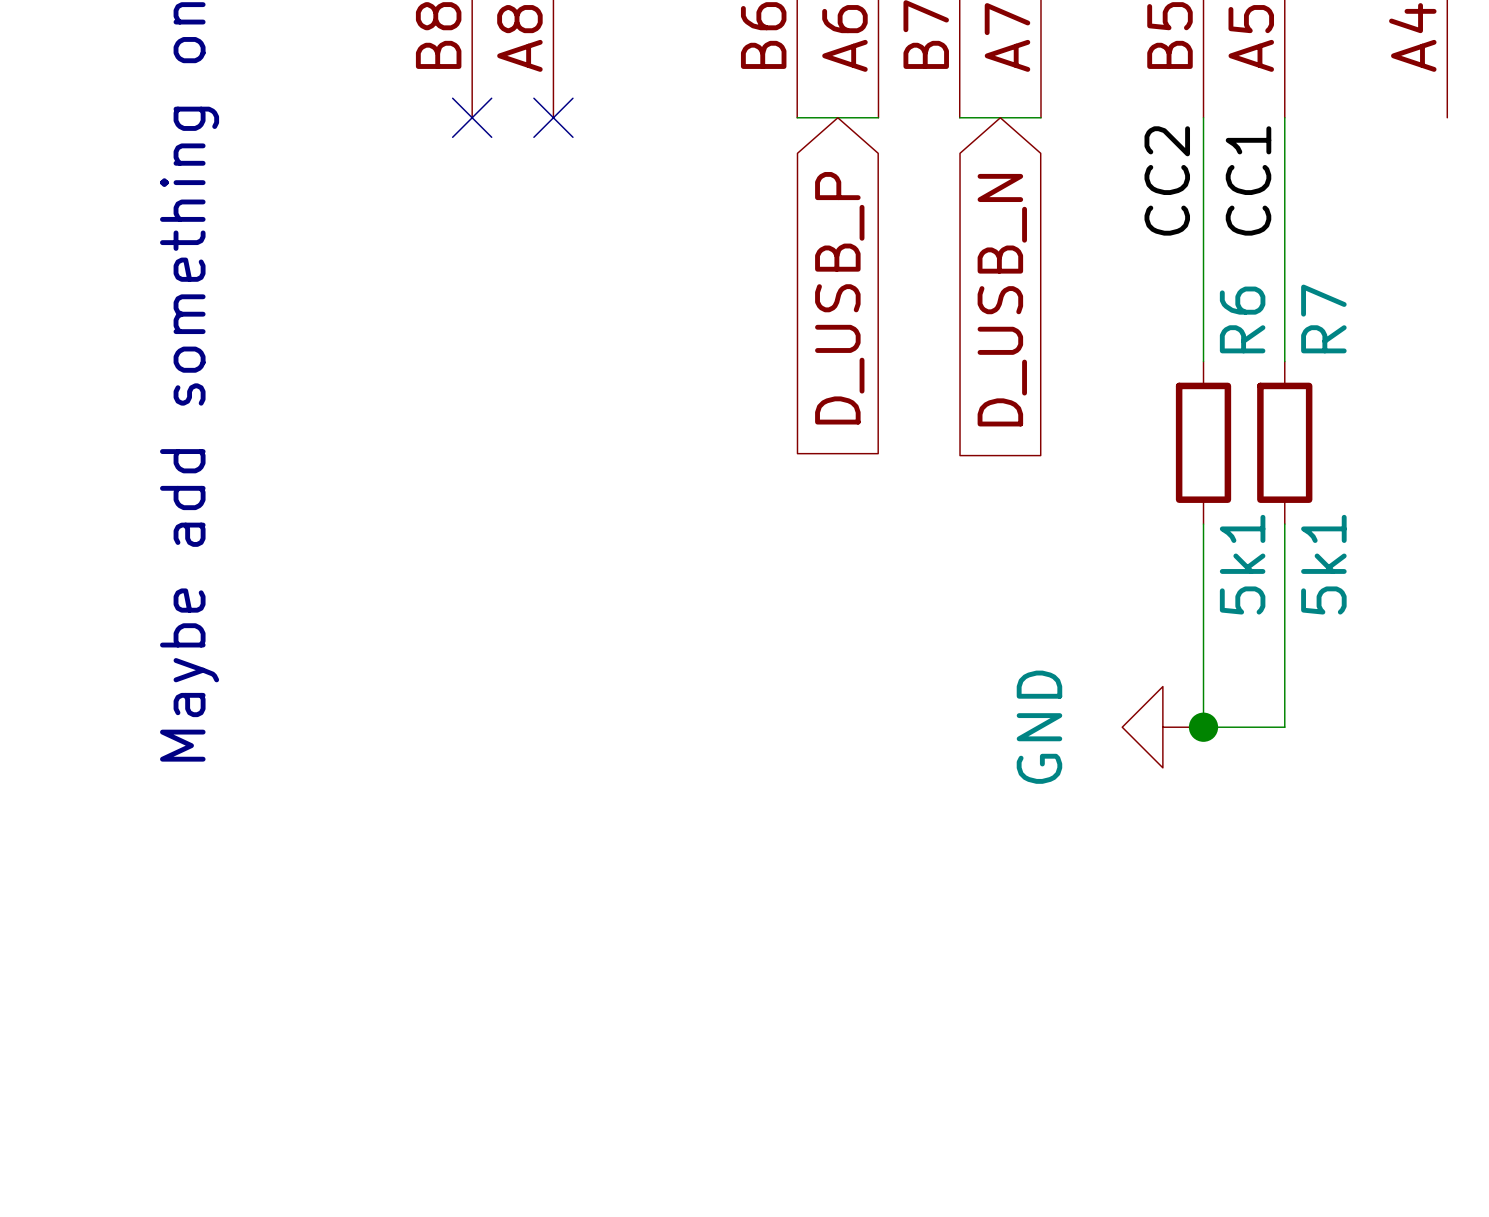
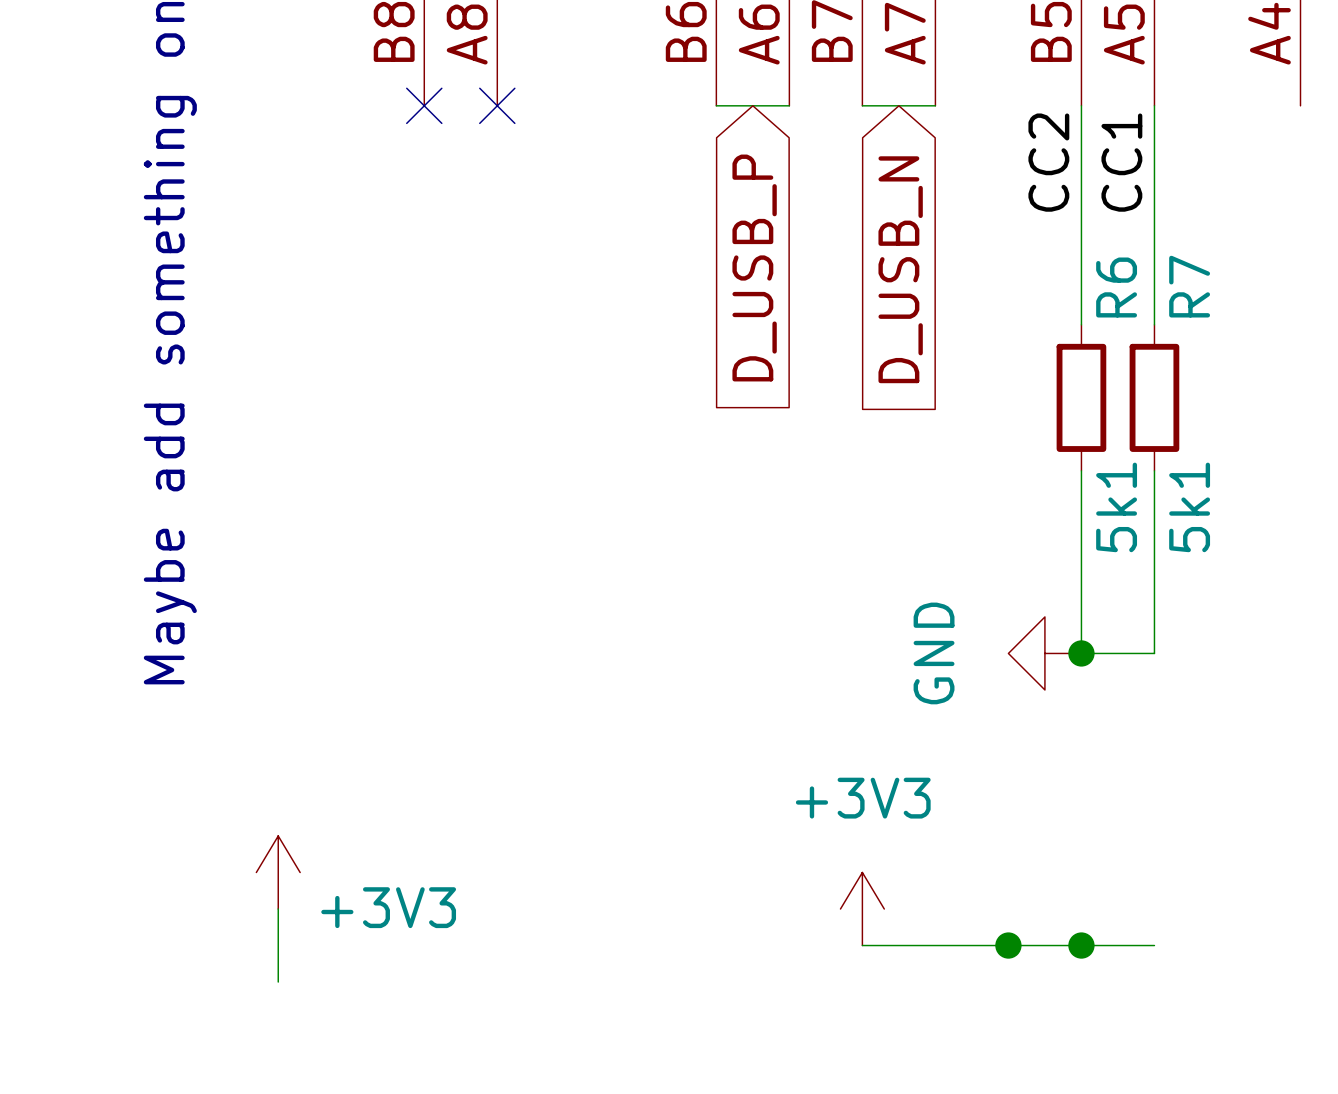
power symbol: none -> +3V3 (278, 872)
wire: none -> (278, 909) (278, 982)
power symbol: none -> +3V3 (862, 909)
wire: none -> (862, 945) (1154, 945)
junction: none -> (1008, 945)
junction: none -> (1081, 945)

